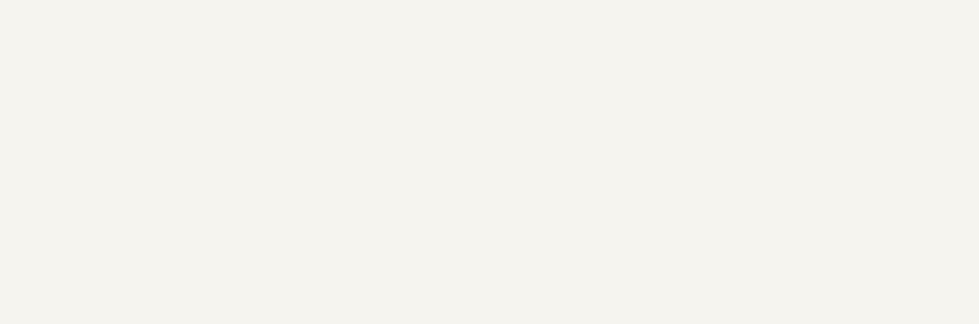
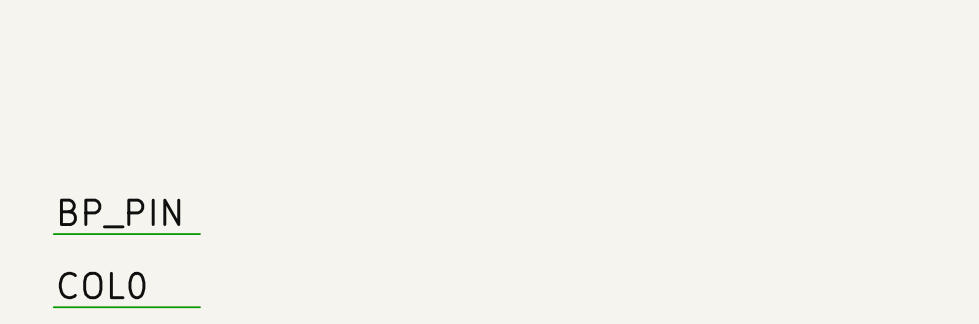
label: none -> BP_PIN (120, 213)
wire: none -> (53, 234) (200, 234)
label: none -> COL0 (102, 285)
wire: none -> (53, 307) (200, 307)

